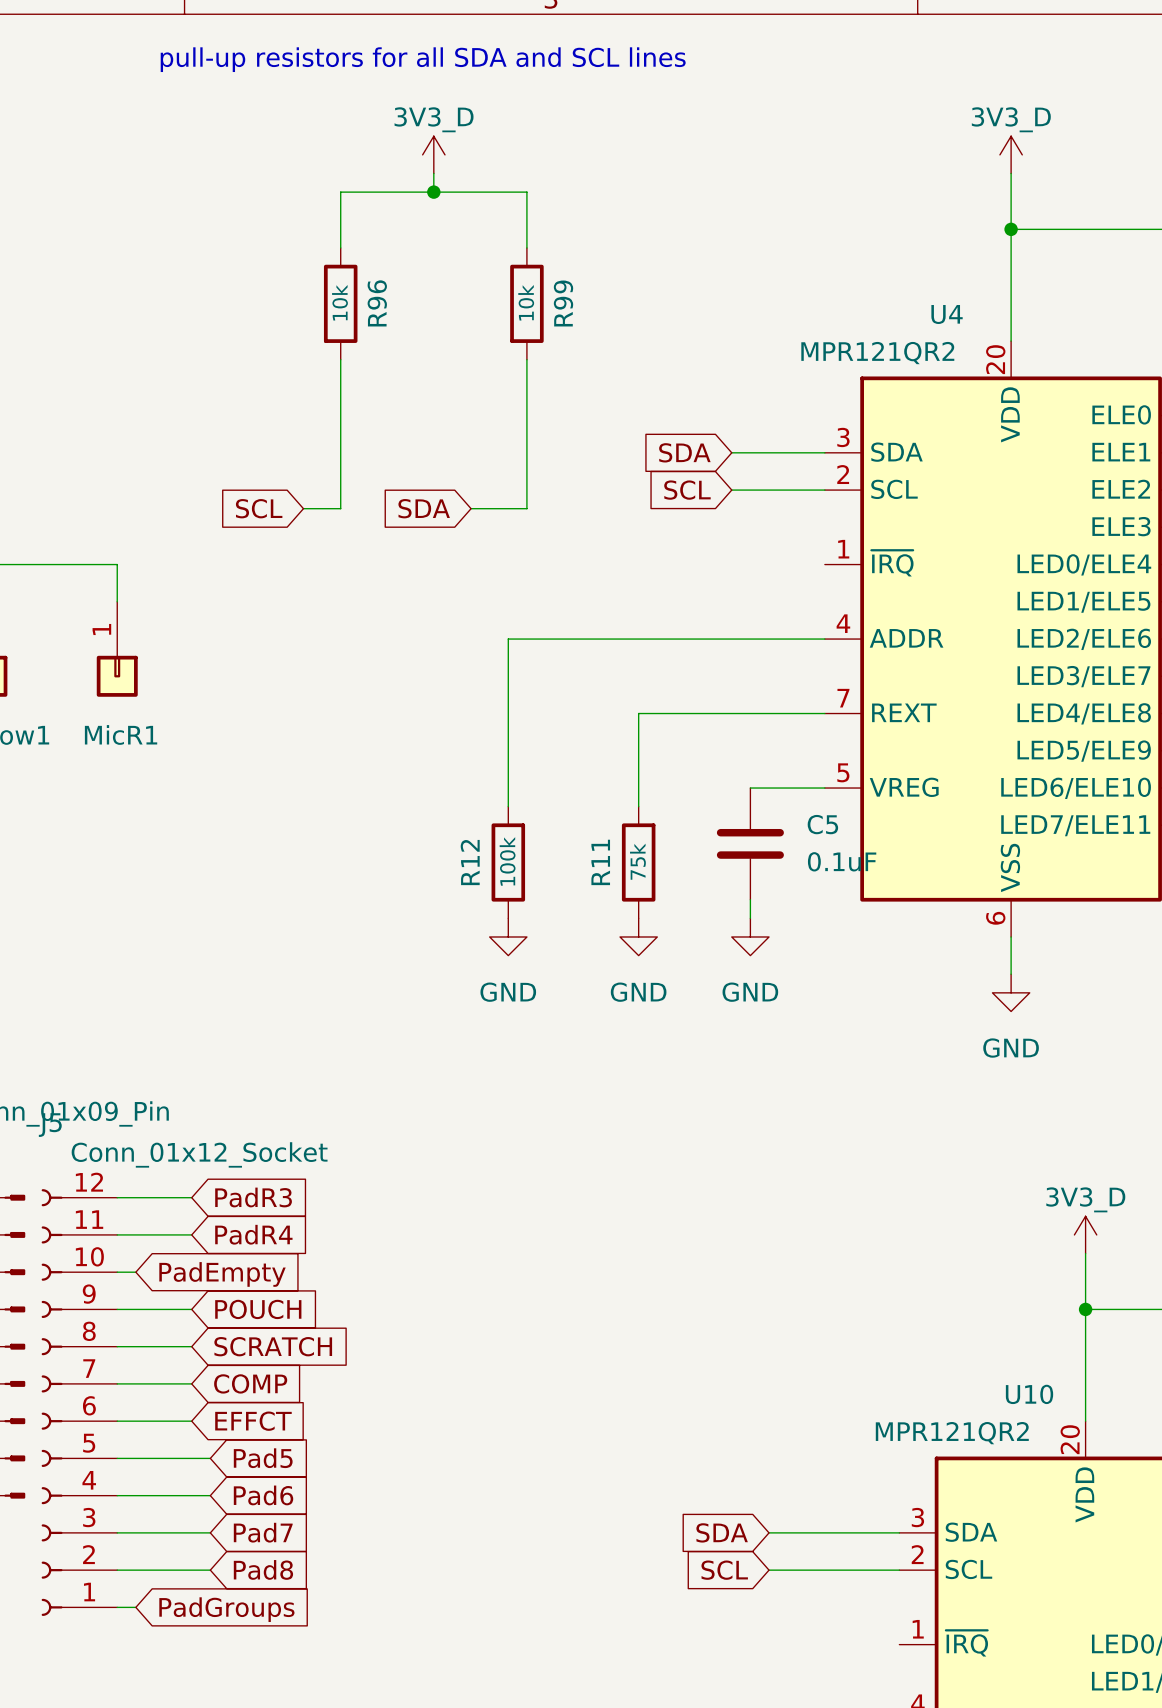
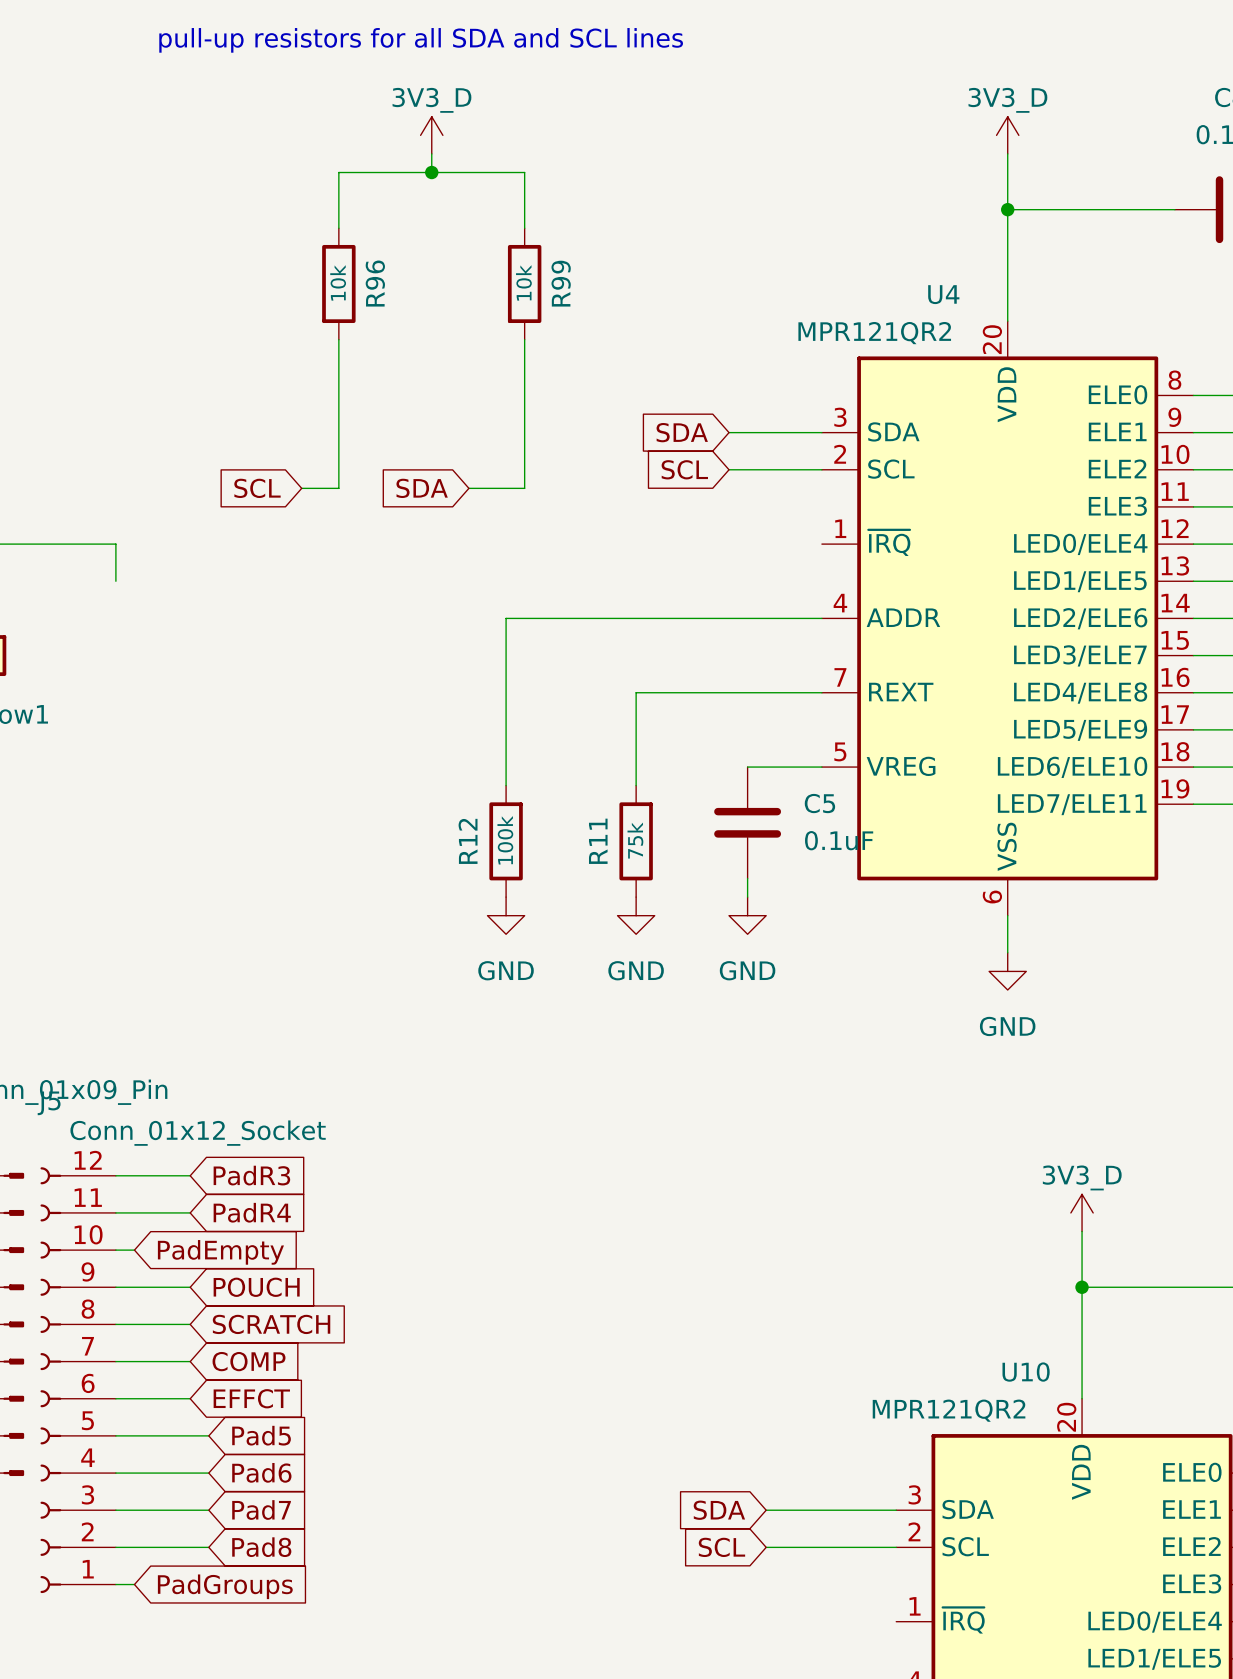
MicR1: (117, 649) -> none

